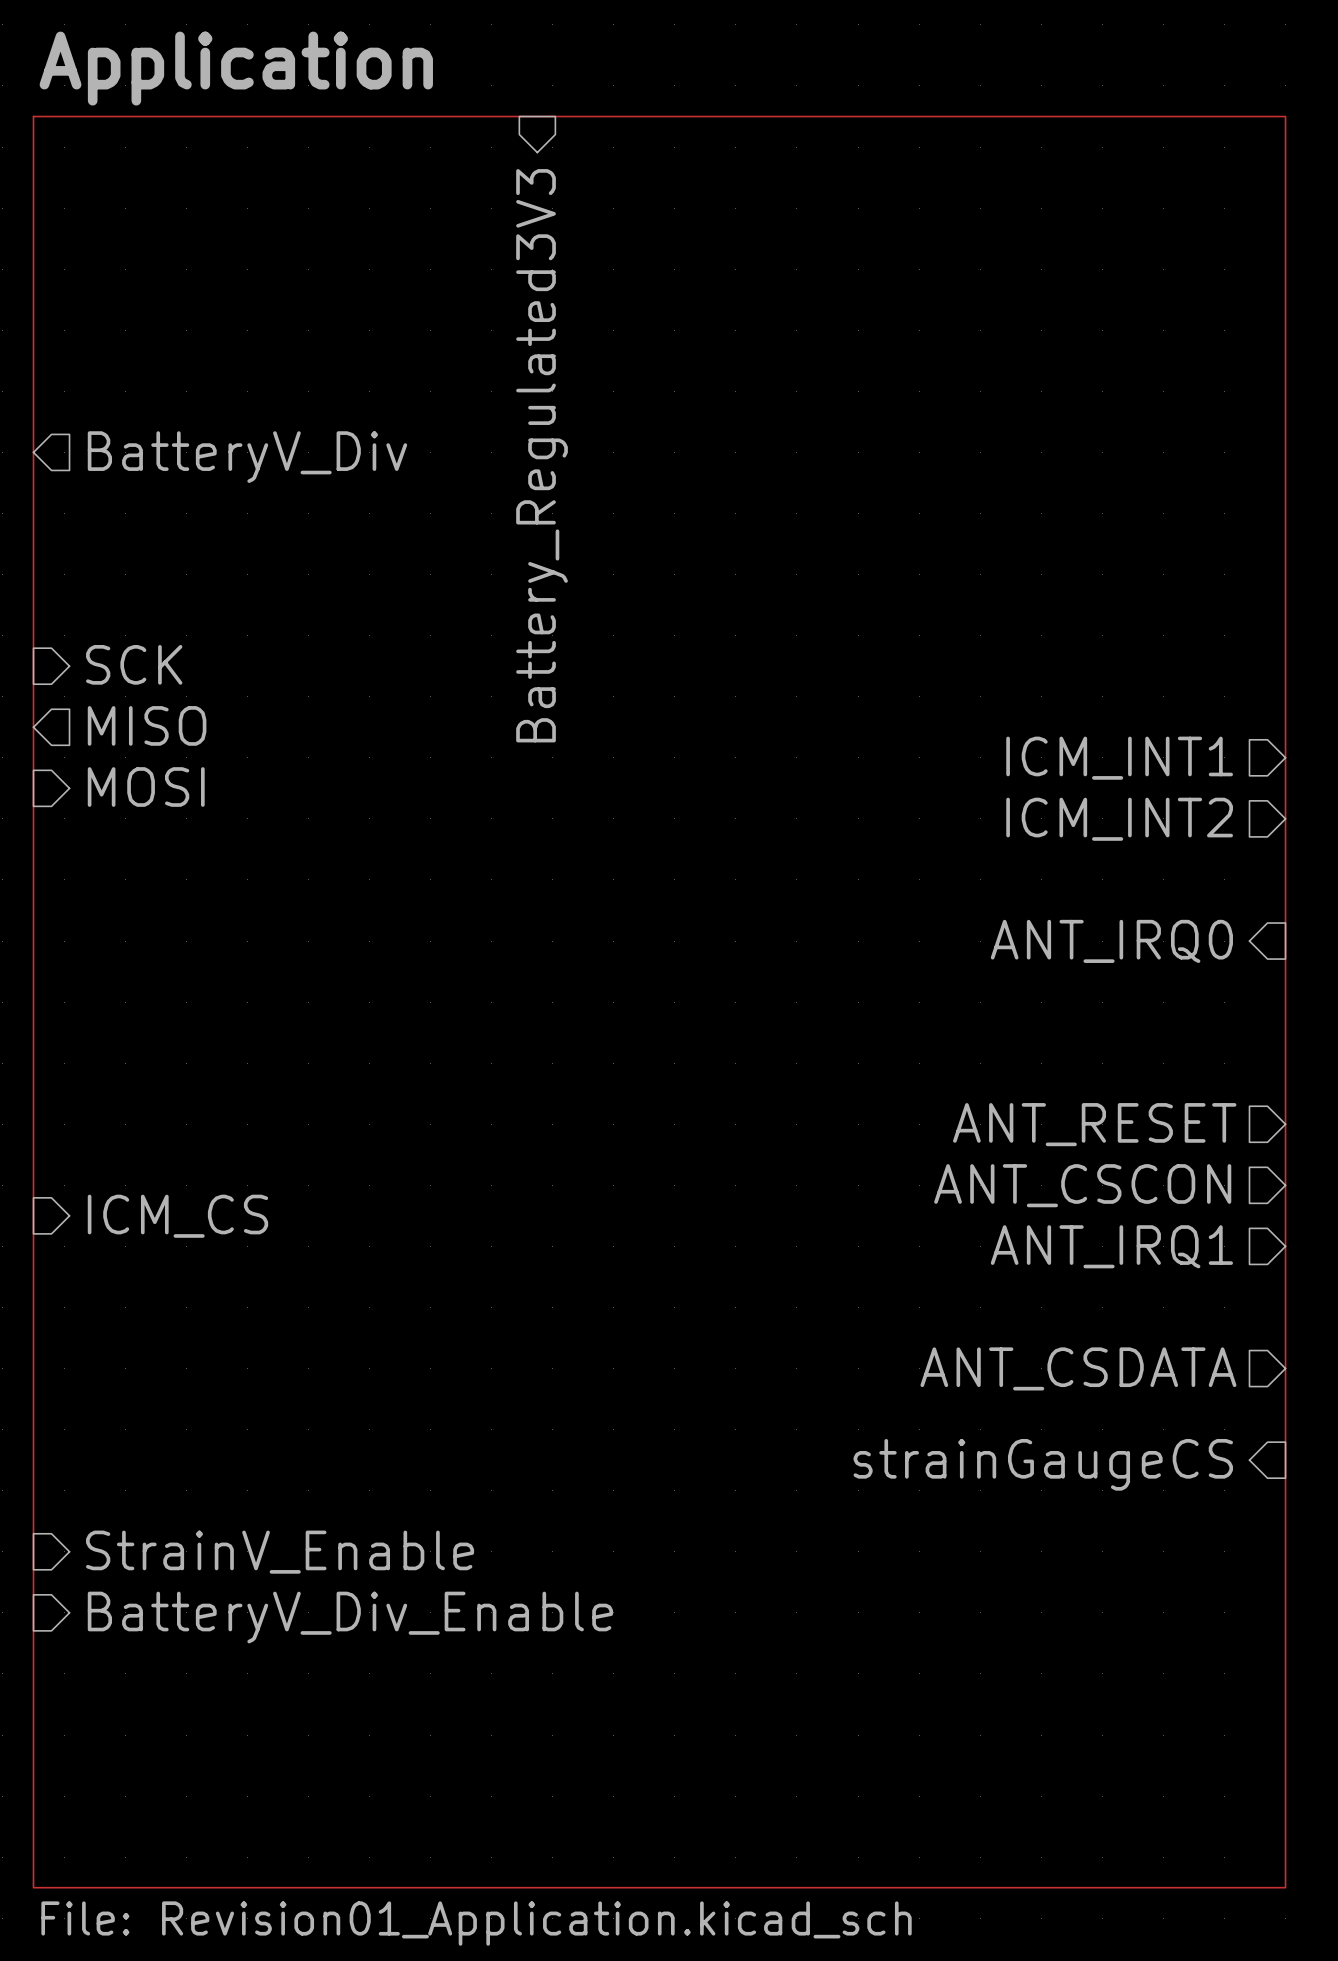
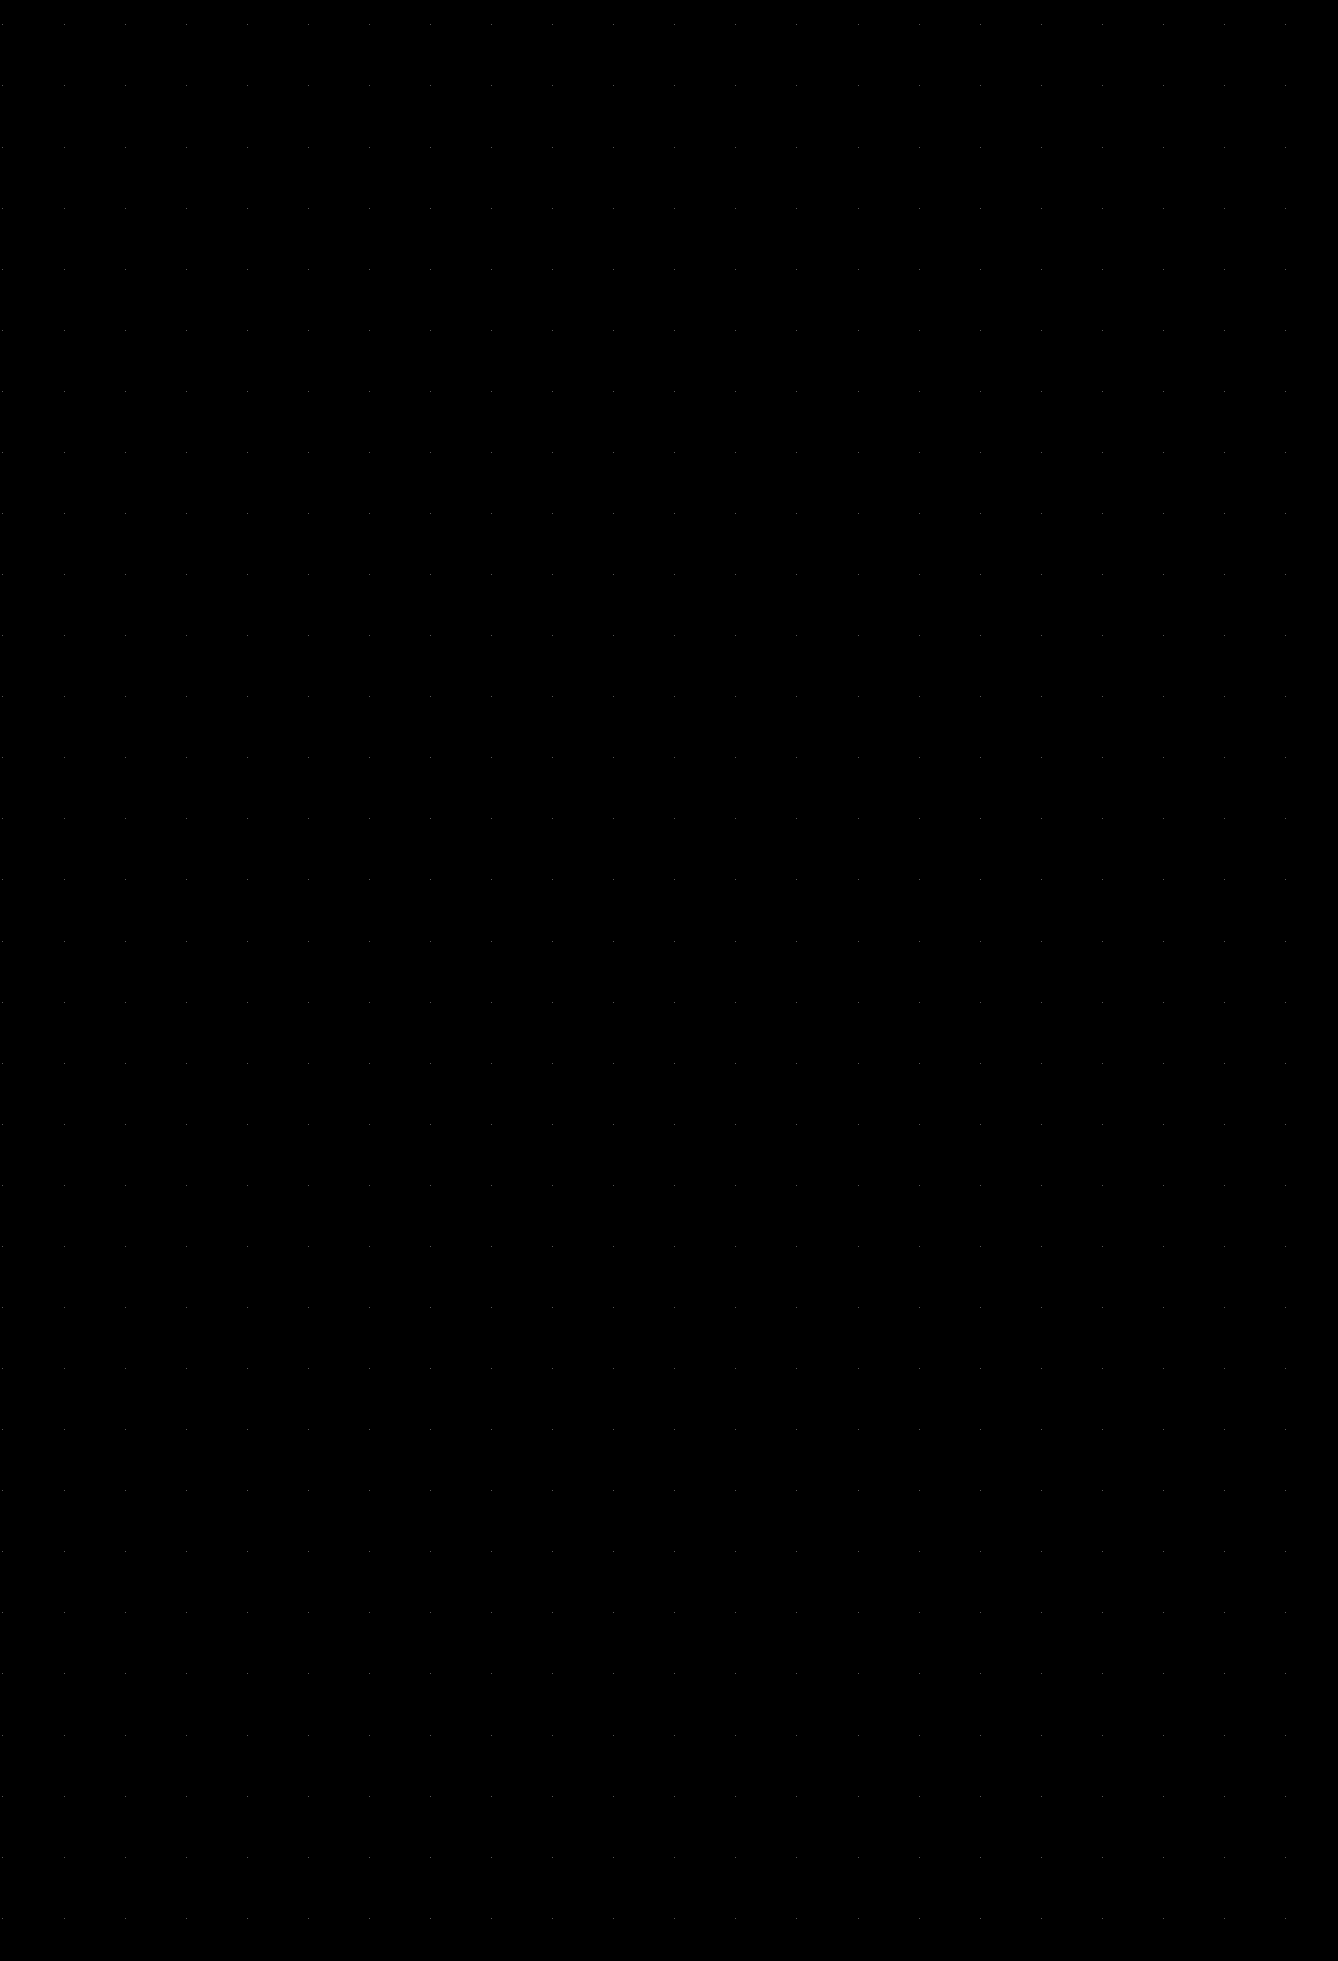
sheet pin: Battery_Regulated3V3 (542, 455) -> none
sheet pin: BatteryV_Div (247, 457) -> none
sheet pin: SCK (134, 664) -> none
sheet pin: MISO (147, 725) -> none
sheet pin: ICM_INT1 (1119, 758) -> none
sheet pin: MOSI (146, 787) -> none
sheet pin: ICM_INT2 (1119, 819) -> none
sheet pin: ANT_IRQ0 (1111, 941) -> none
sheet Application: File: Revision01_Application.kicad_sch (659, 1002) -> none
sheet pin: ANT_RESET (1094, 1124) -> none
sheet pin: ANT_CSCON (1082, 1185) -> none
sheet pin: ICM_CS (177, 1216) -> none
sheet pin: ANT_IRQ1 (1111, 1246) -> none
sheet pin: ANT_CSDATA (1078, 1368) -> none
sheet pin: strainGaugeCS (1043, 1464) -> none
sheet pin: StrainV_Enable (280, 1552) -> none
sheet pin: BatteryV_Div_Enable (350, 1617) -> none

